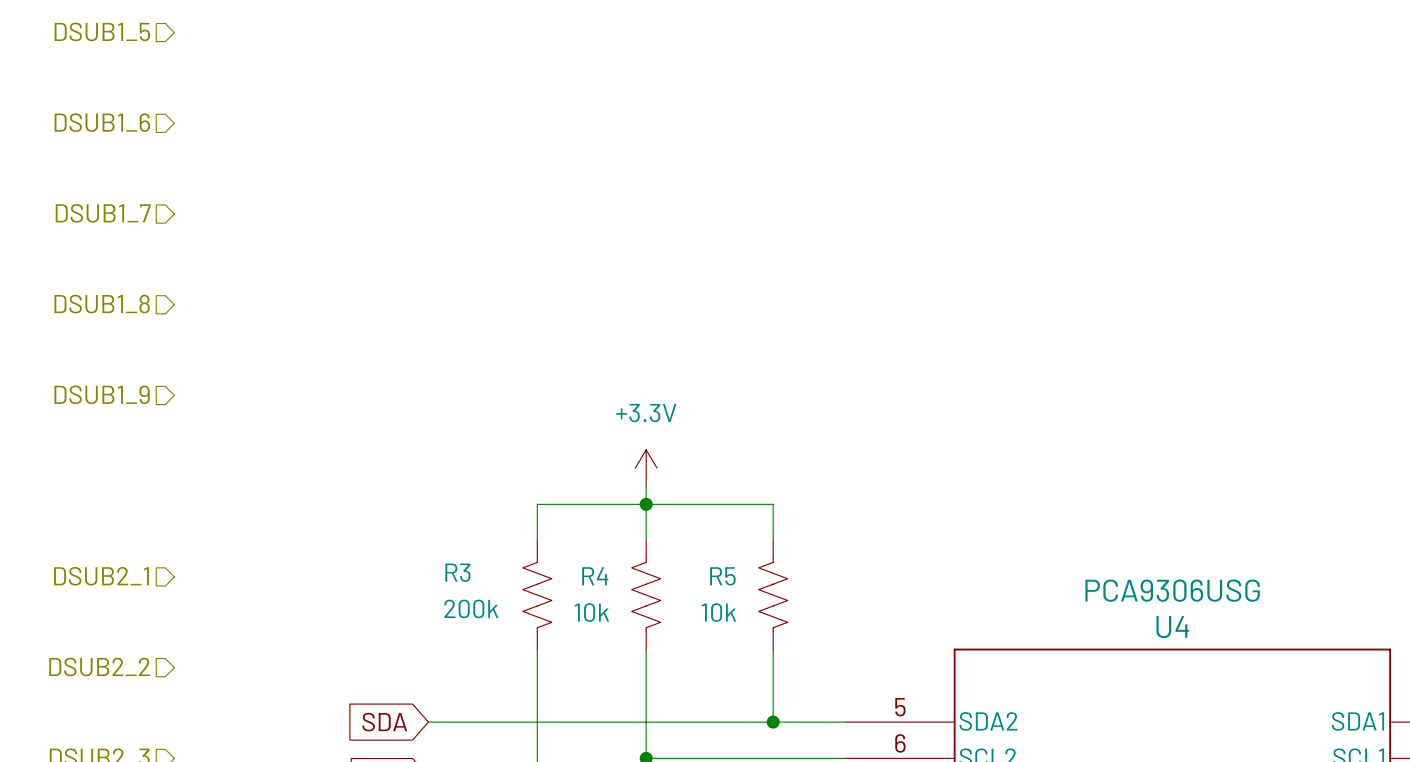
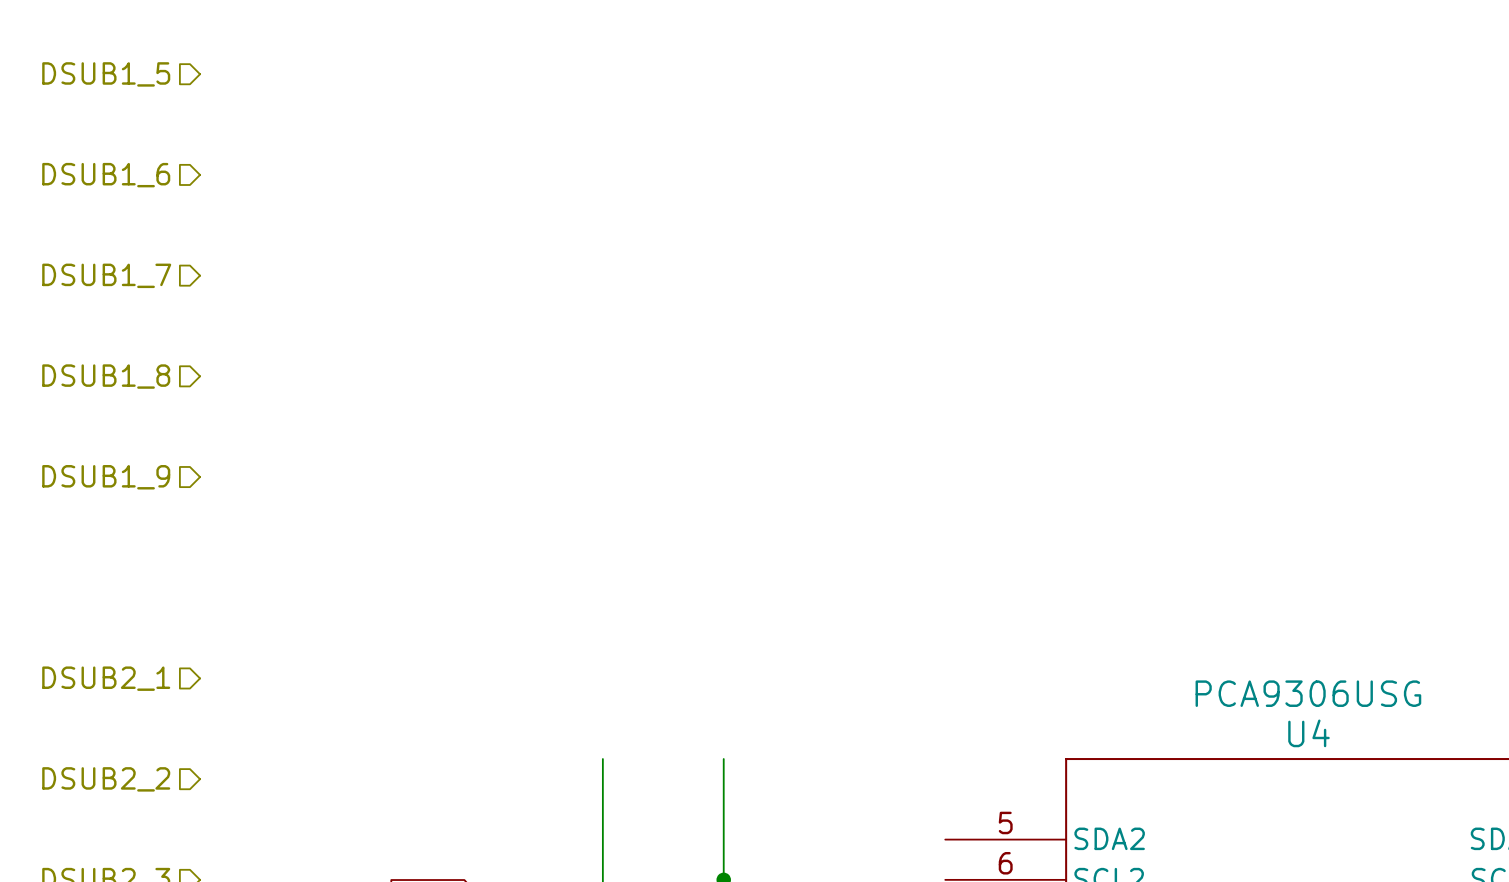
power symbol: +3.3V (646, 468) -> none
wire: (646, 486) (646, 540) -> none
junction: (646, 504) -> none
wire: (537, 540) (537, 504) (773, 504) (773, 540) -> none
R3: 200k (537, 595) -> none
R4: 10k (646, 595) -> none
R5: 10k (773, 595) -> none
wire: (773, 649) (773, 722) -> none
global label: SDA (384, 722) -> none
wire: (428, 722) (845, 722) -> none
junction: (773, 722) -> none
wire: (646, 758) (845, 758) -> none

